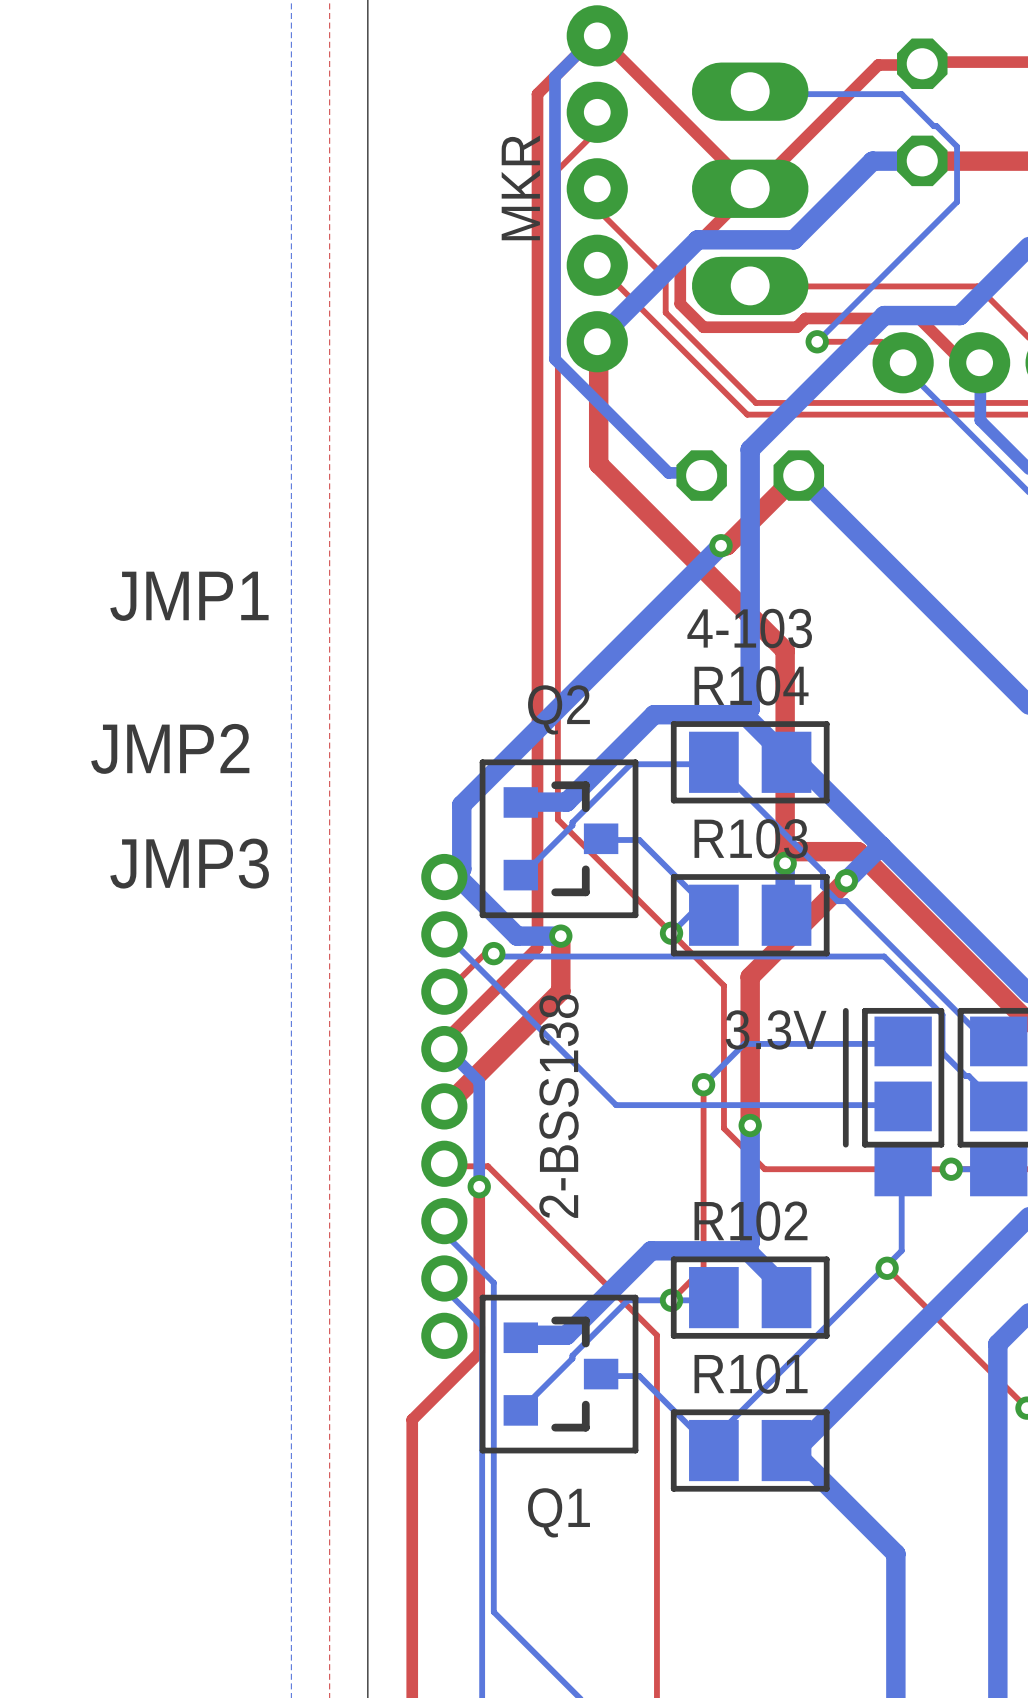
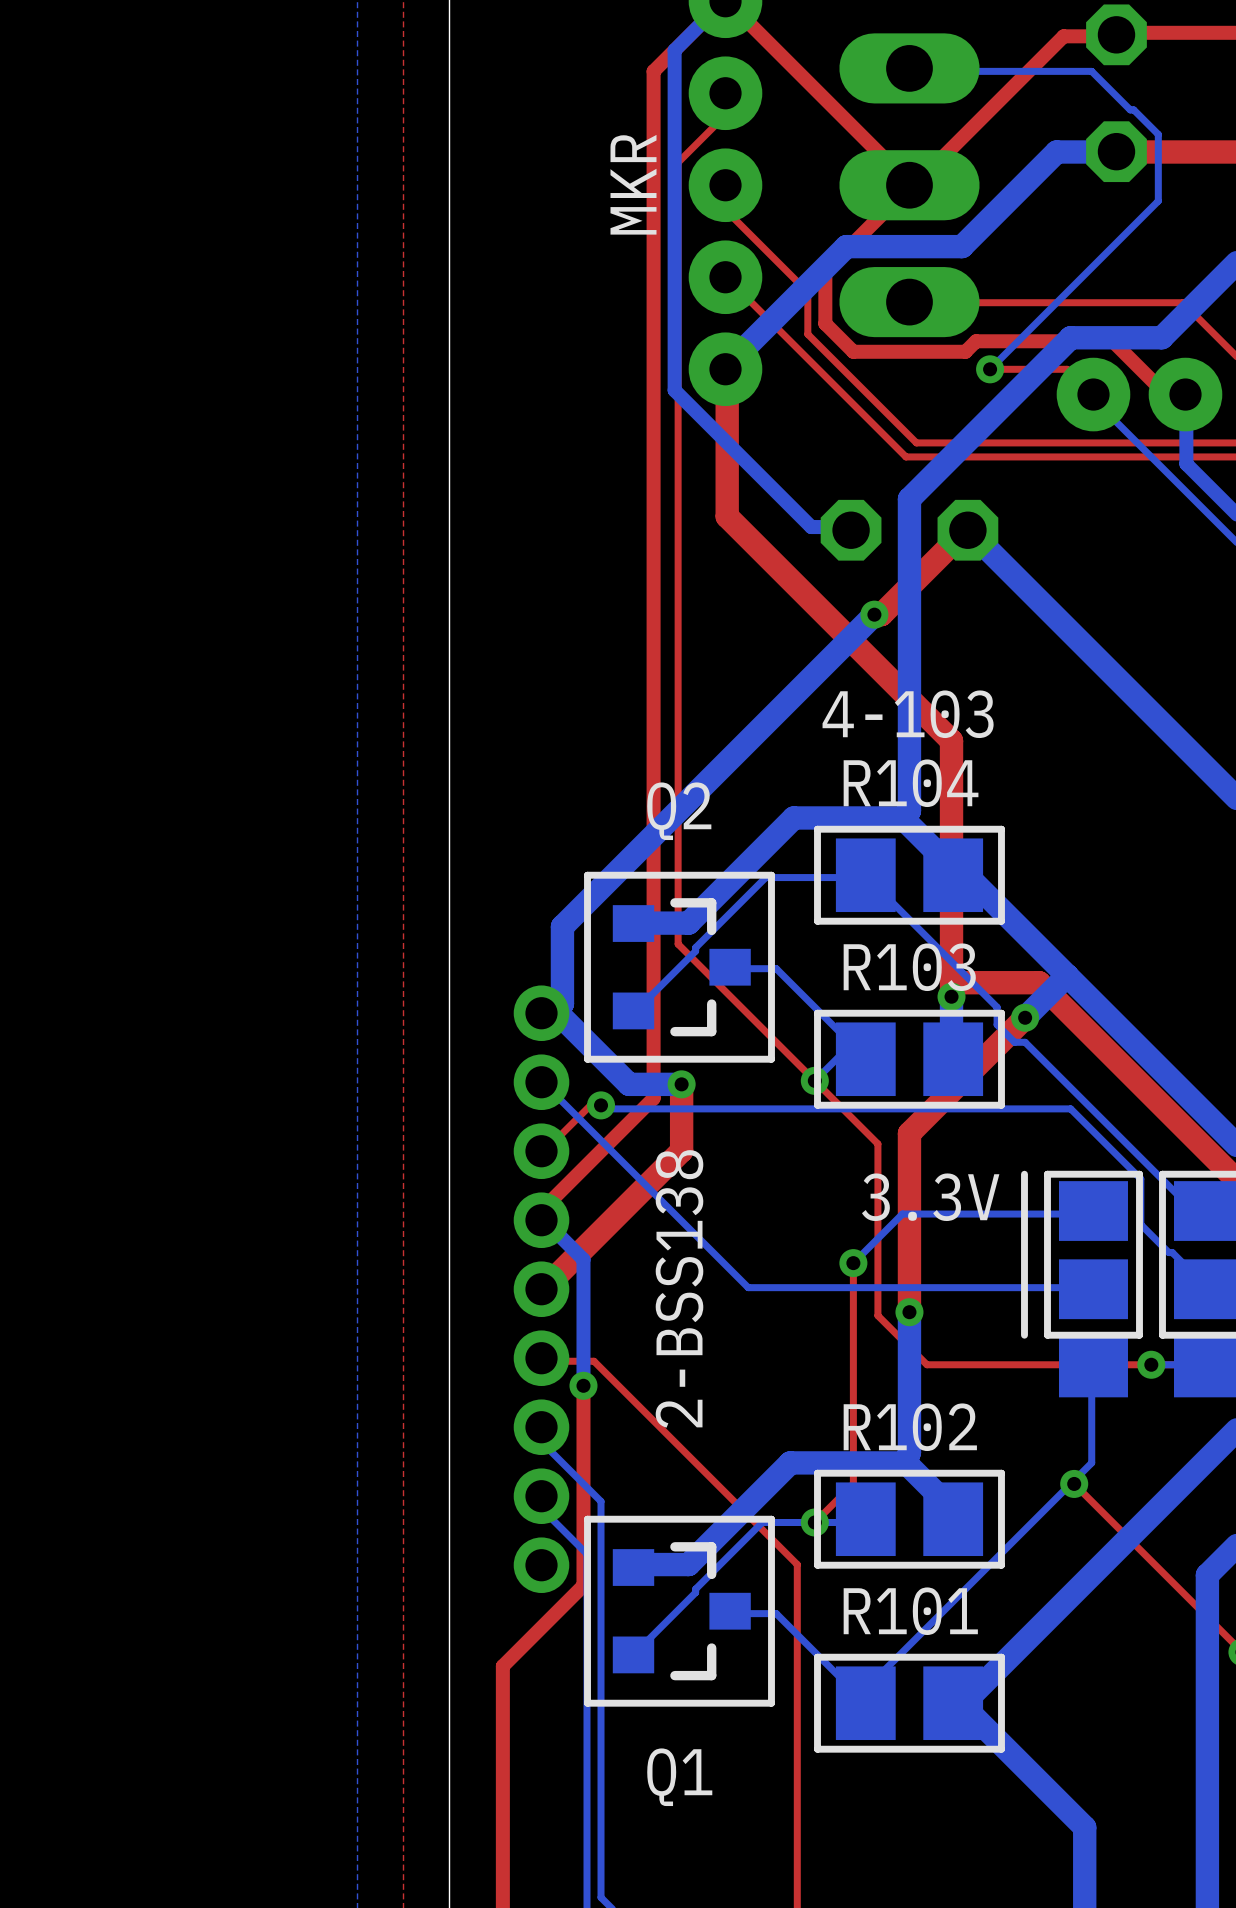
JMP1 name: JMP1 (189, 596) -> none
JMP2 name: JMP2 (170, 748) -> none
JMP3 name: JMP3 (189, 863) -> none

